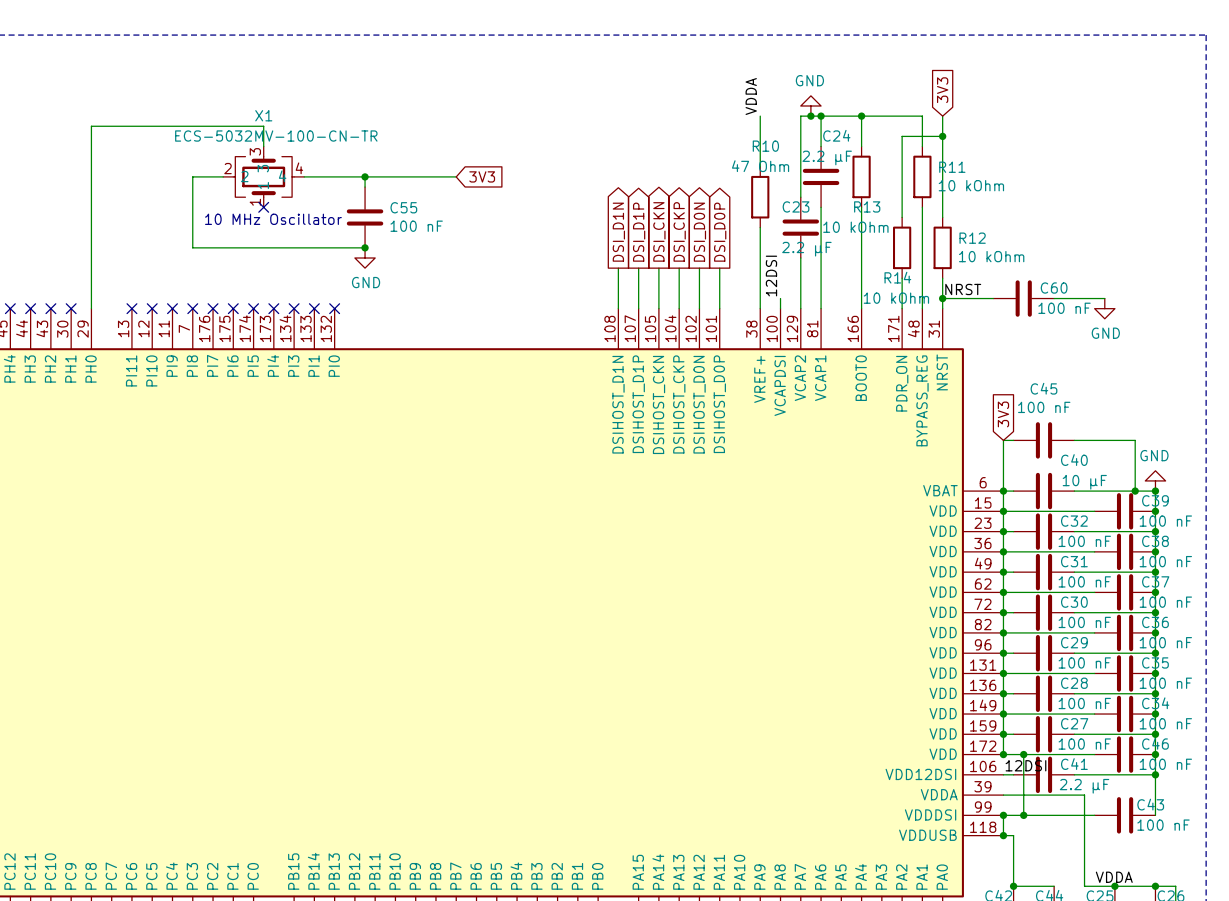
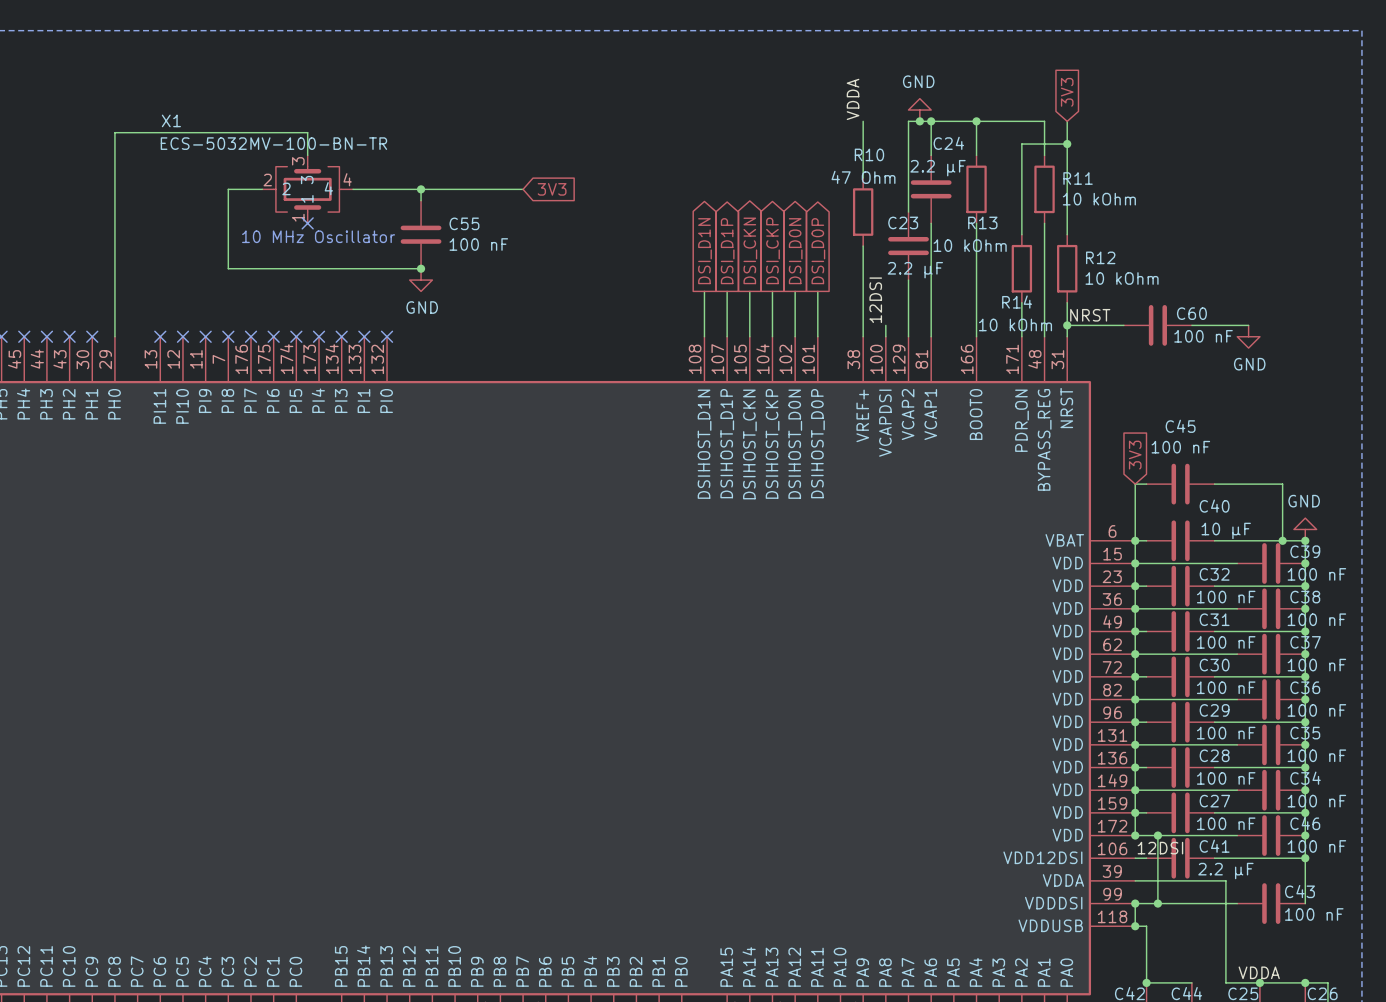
X1 name position: X1 (263, 115) -> X1 (171, 120)
X1 value: ECS-5032MV-100-CN-TR (276, 136) -> ECS-5032MV-100-BN-TR (273, 143)

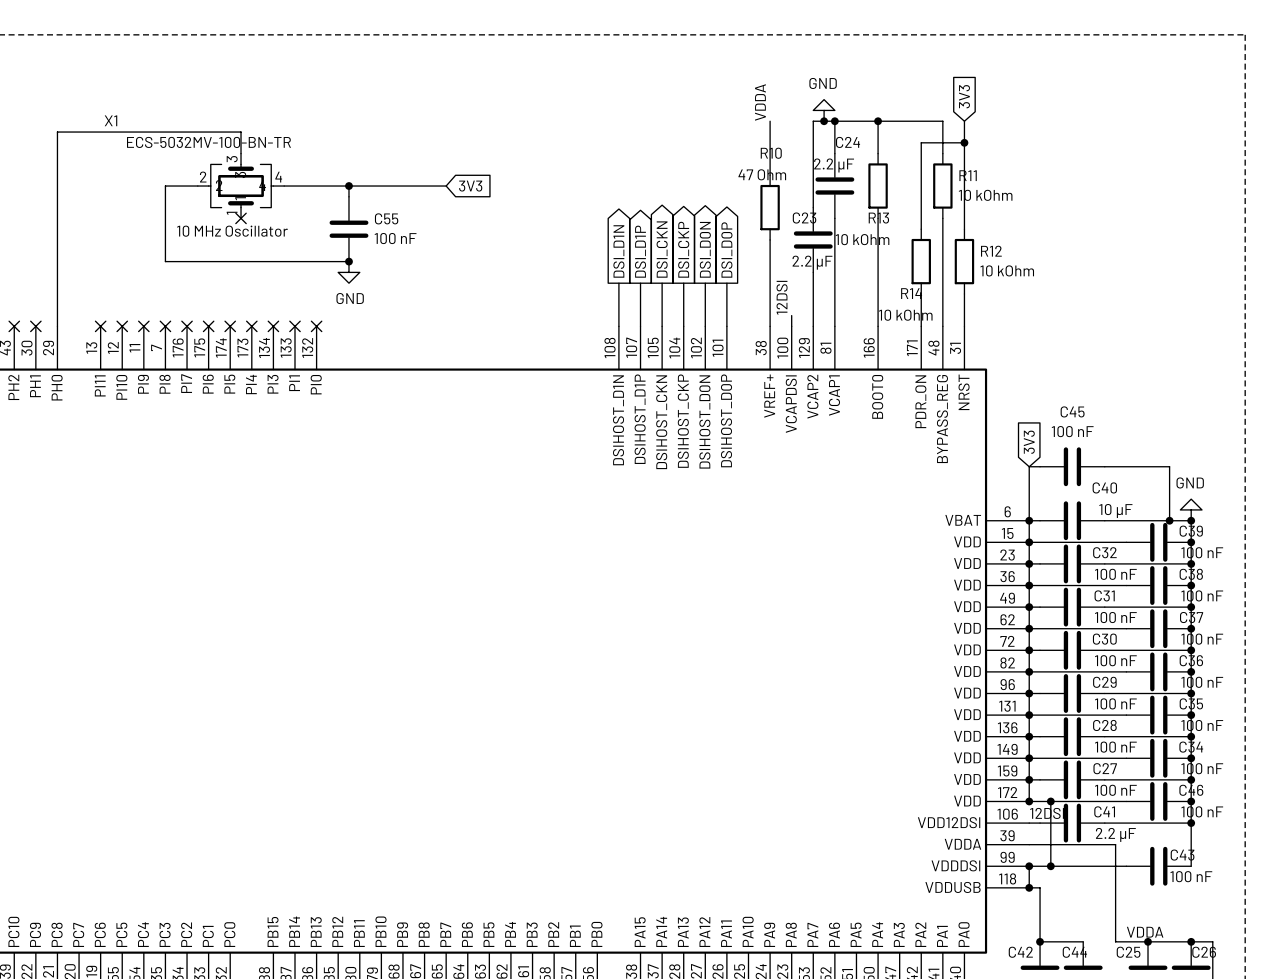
label: NRST (1090, 315) -> none
wire: (1067, 325) (1123, 325) -> none
junction: (1067, 325) -> none
C60: 100 nF (1157, 325) -> none
wire: (1191, 325) (1248, 325) -> none
power symbol: GND (1248, 336) -> none

